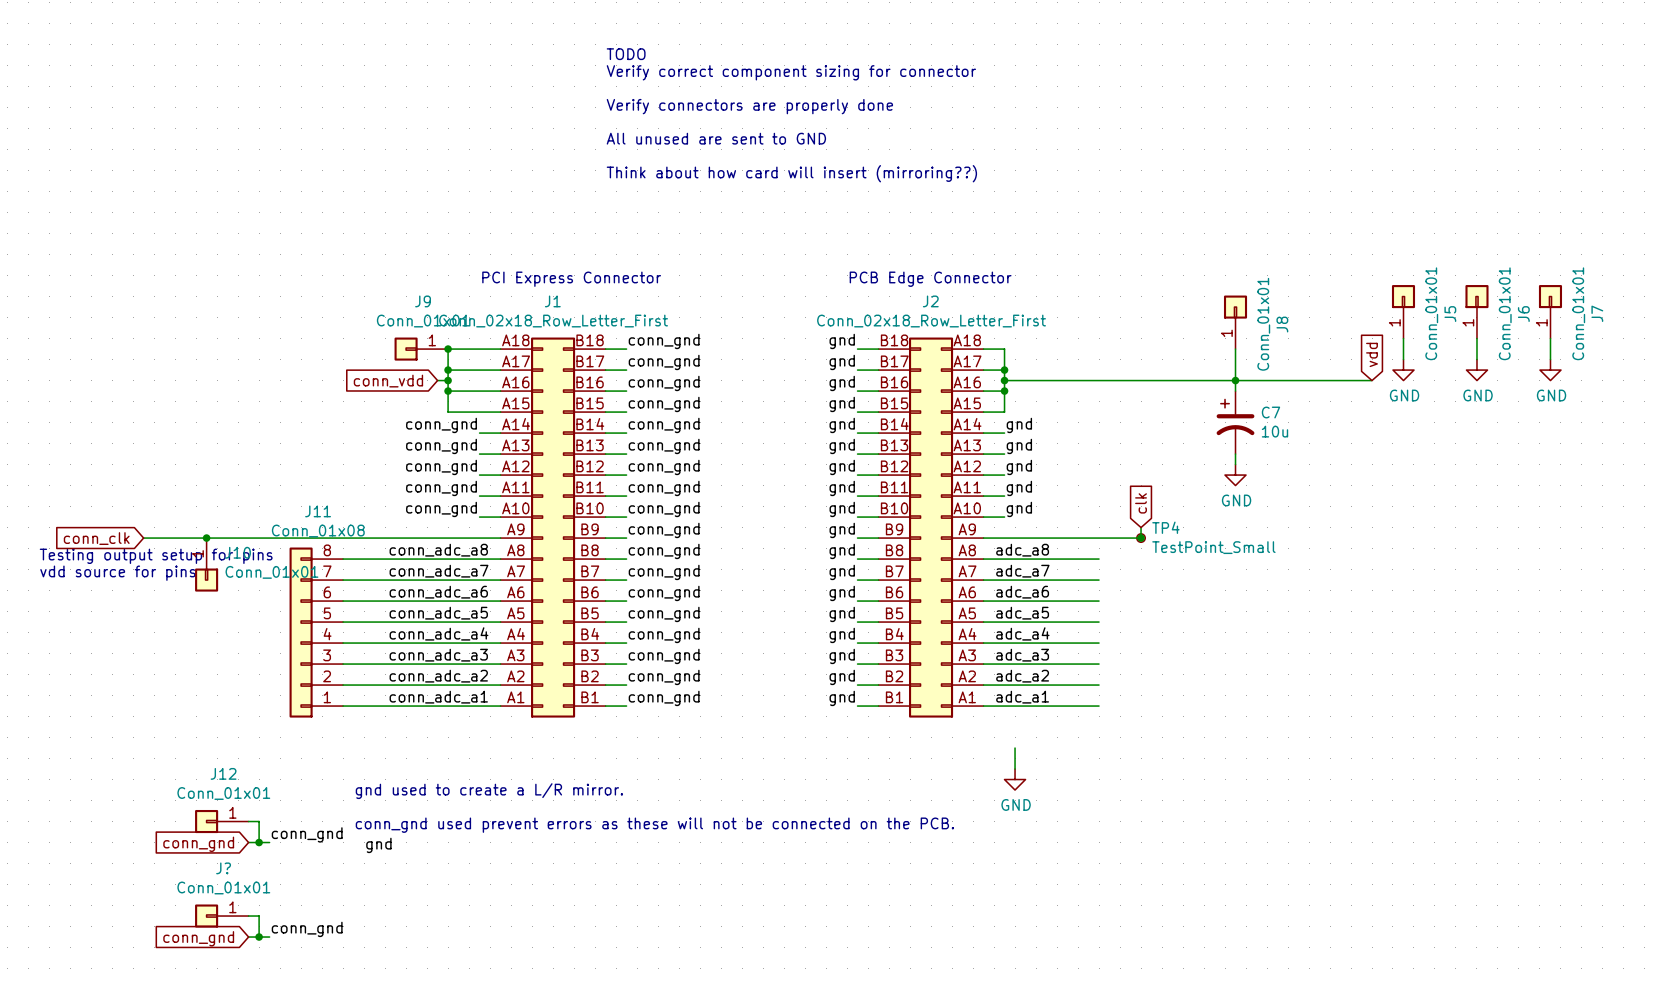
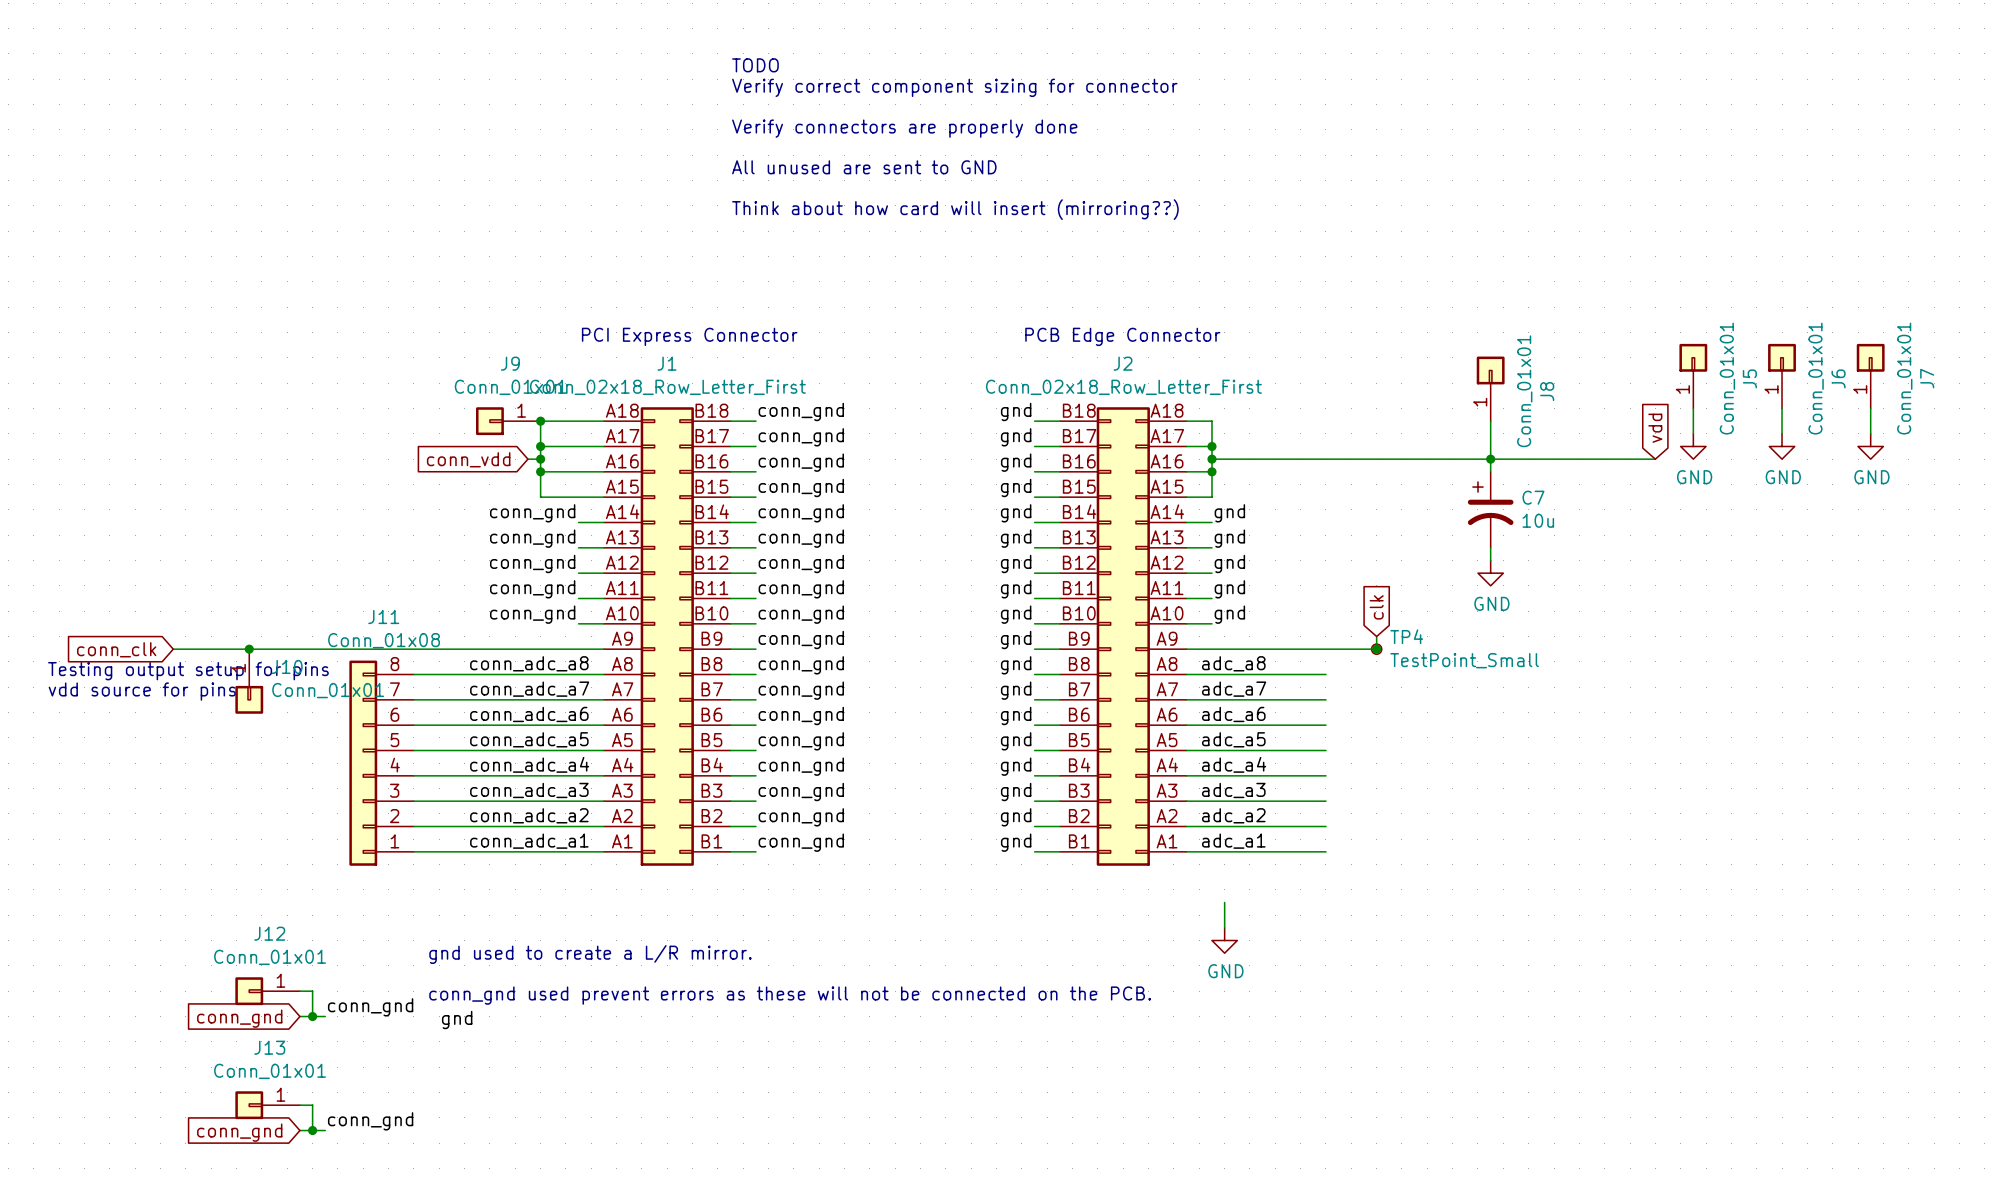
J? name: J? (223, 868) -> J13 (269, 1047)

